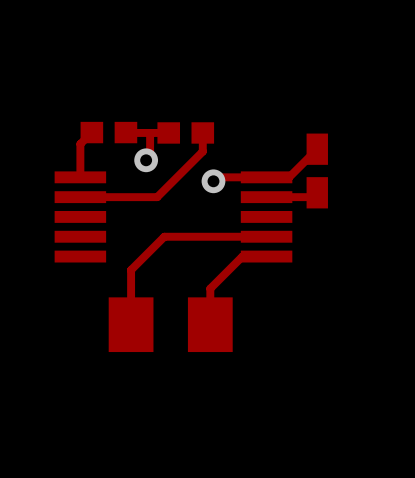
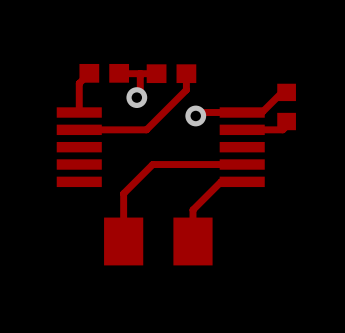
part footprint: [306, 133, 328, 209] -> [277, 83, 296, 131]

